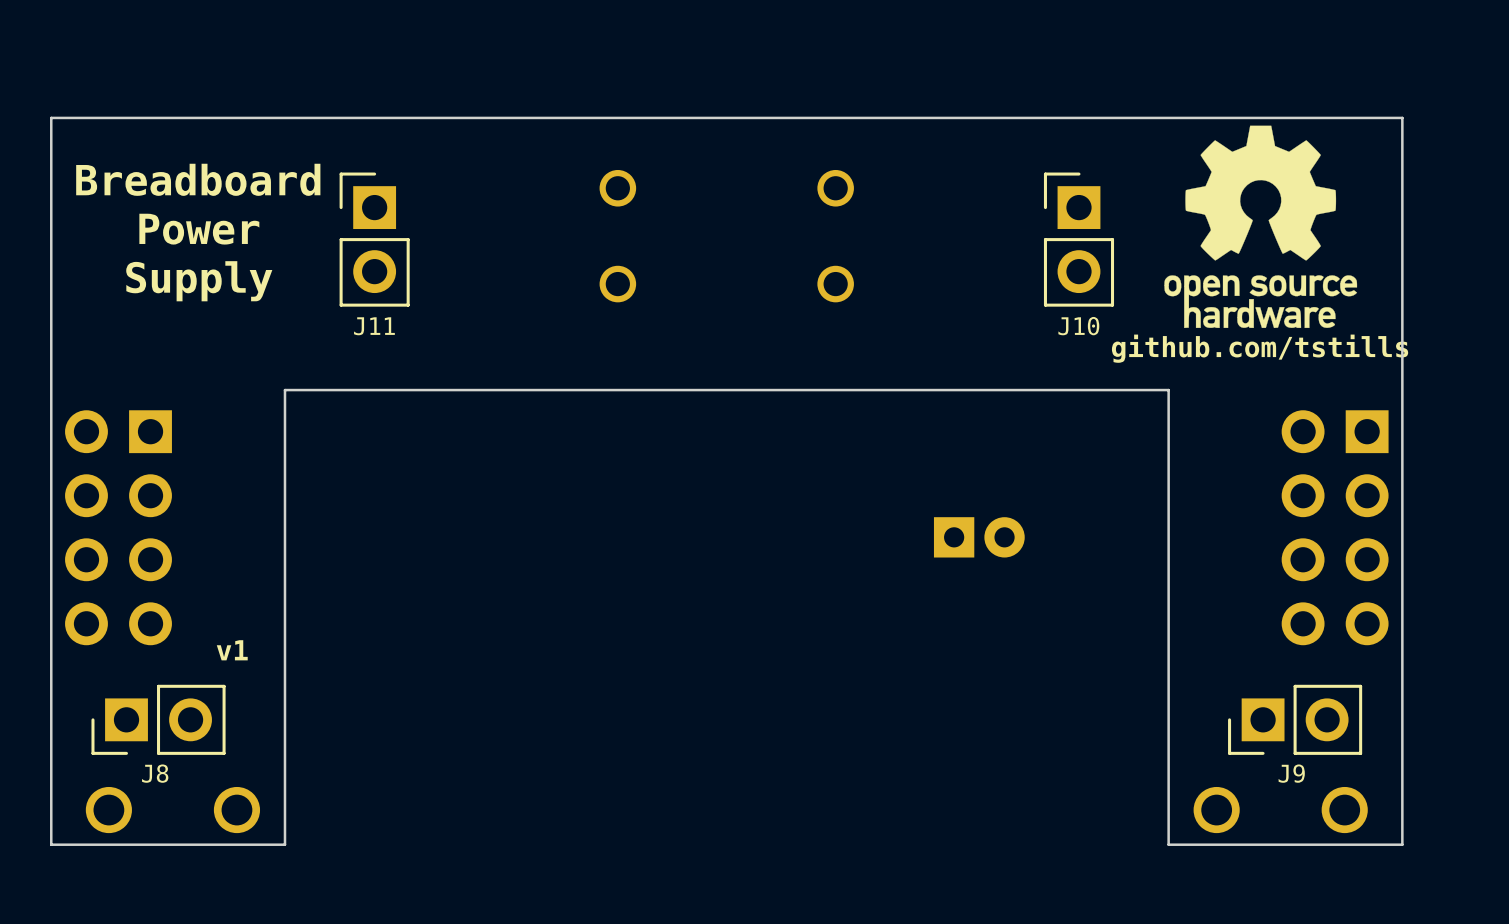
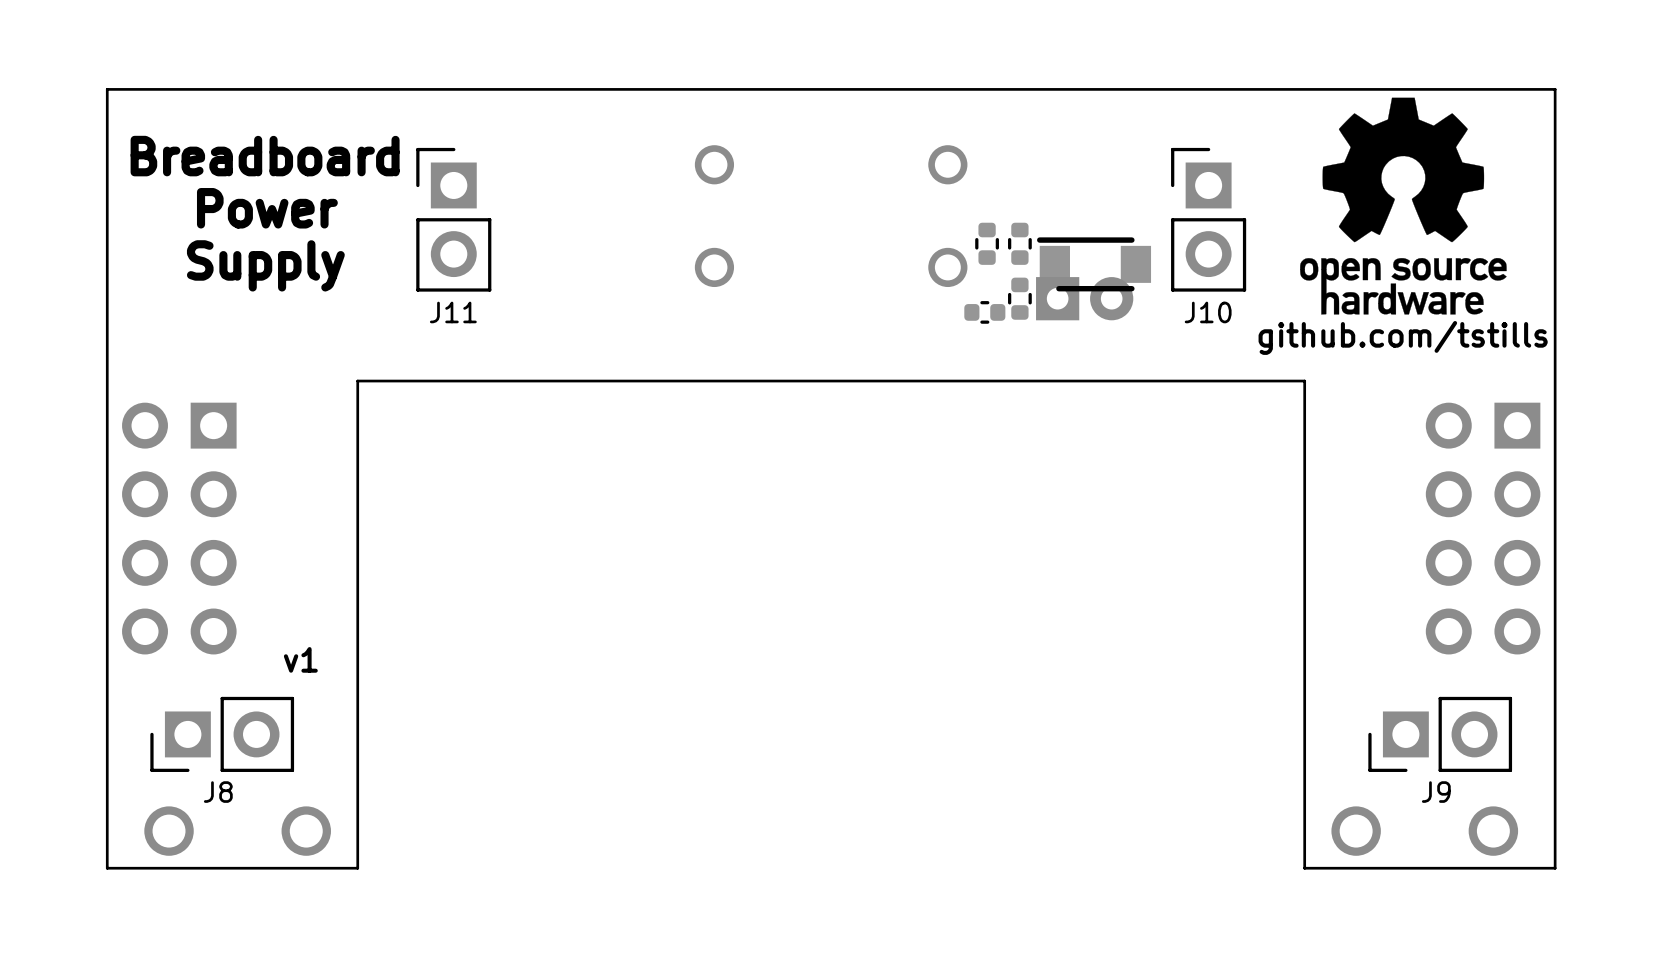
part: none -> (987, 243)
part: none -> (1019, 243)
part: none -> (1094, 264)
part: none -> (1019, 298)
part: none -> (984, 312)
part position: (979, 537) -> (1084, 298)

